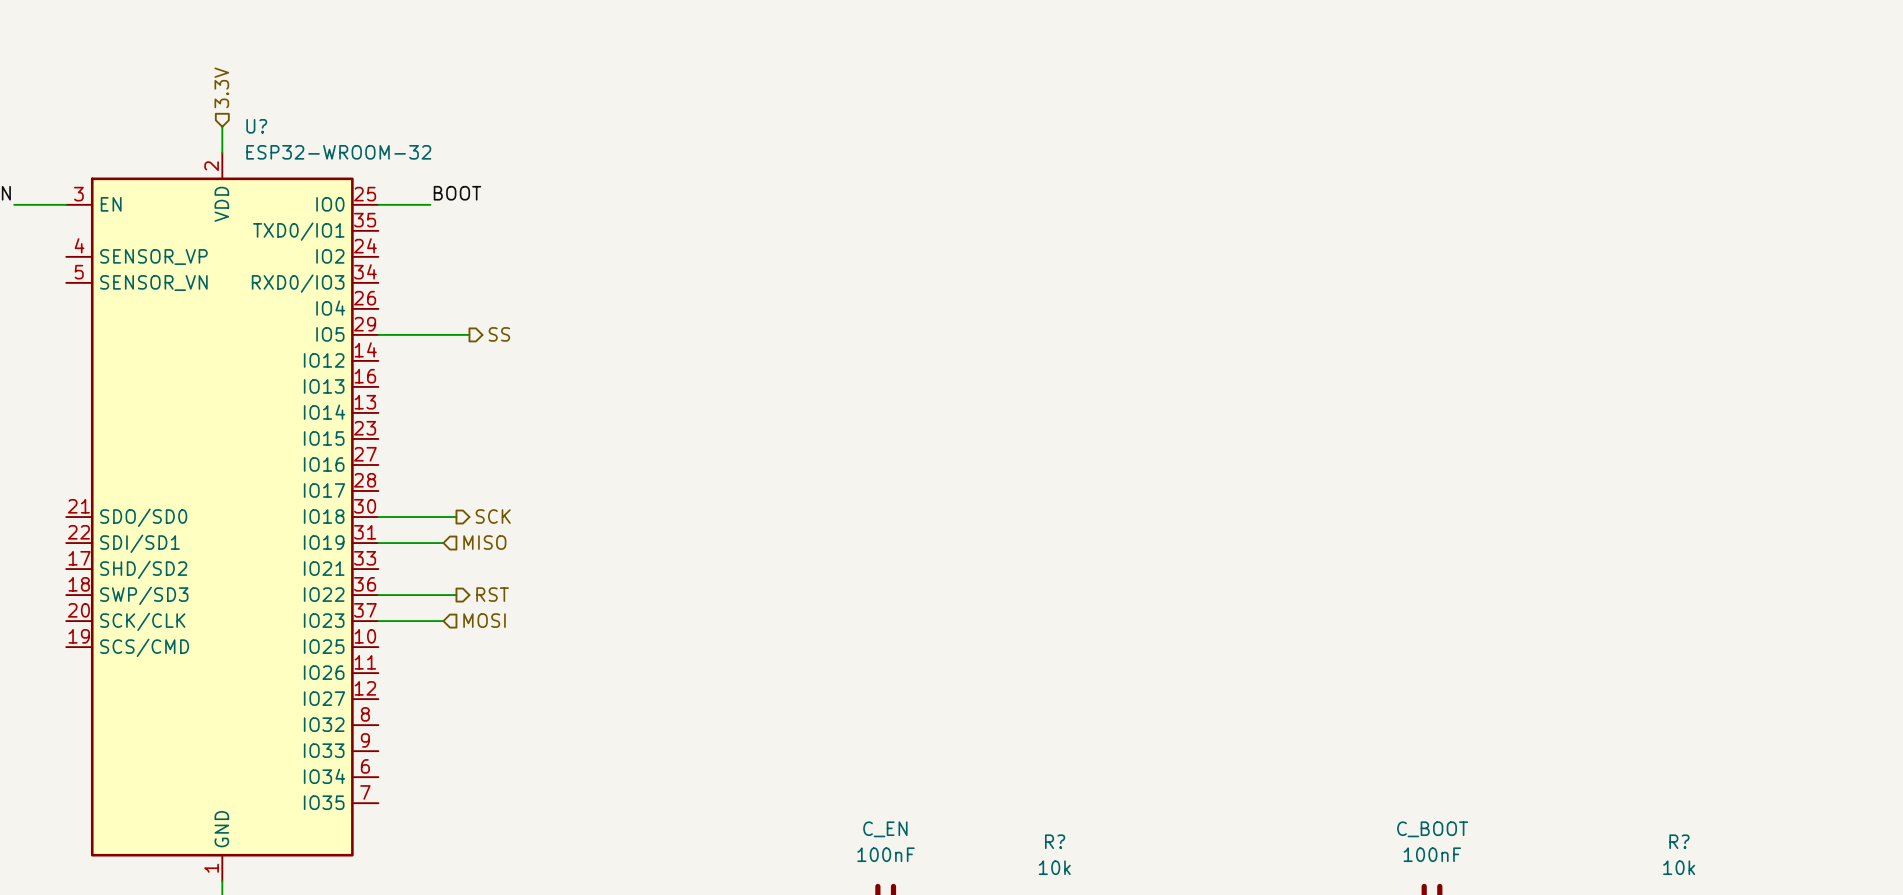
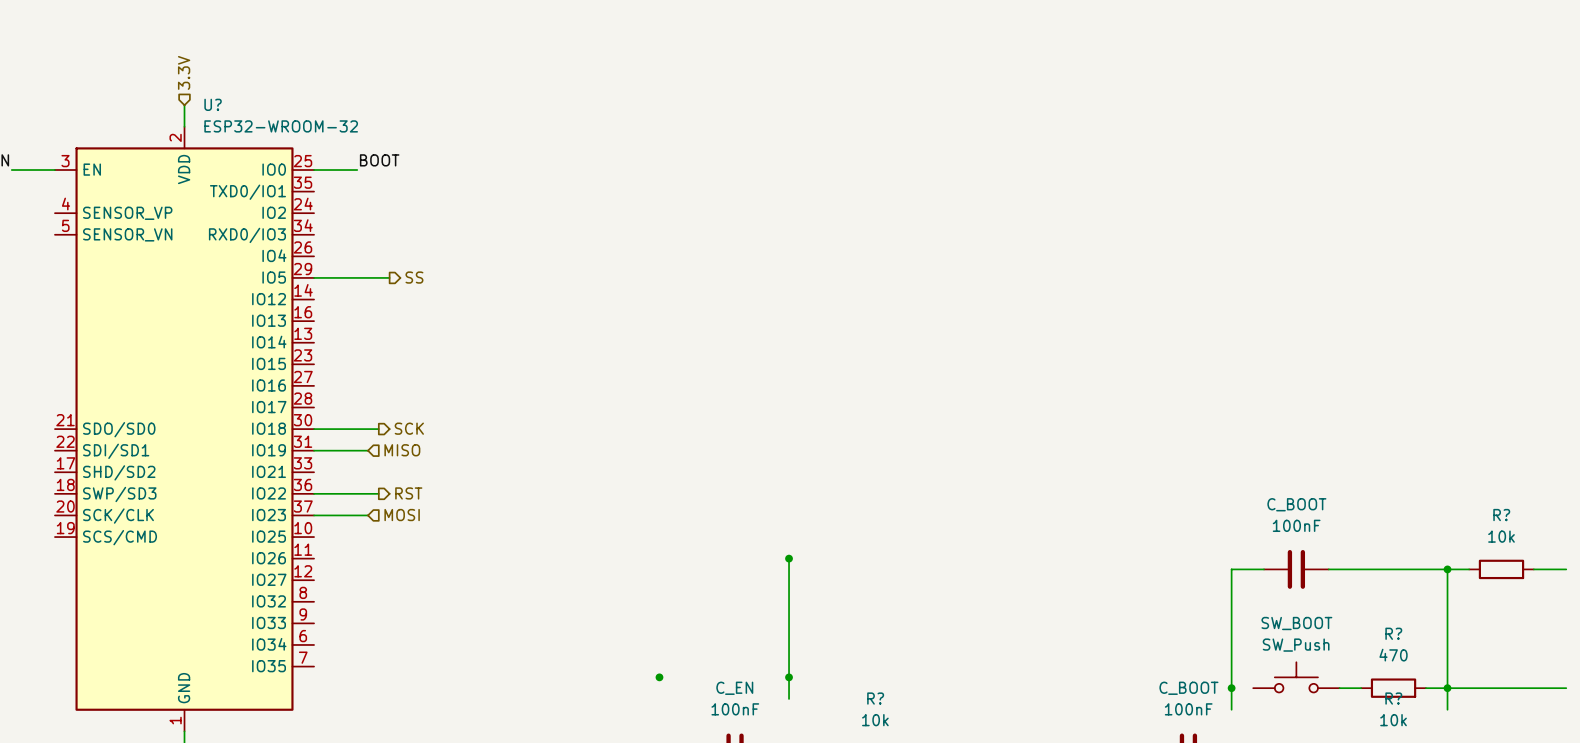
wire: none -> (789, 558) (789, 698)
junction: none -> (789, 558)
wire: none -> (1264, 569) (1231, 569) (1231, 709)
C_BOOT: none -> 100nF (1296, 569)
wire: none -> (1328, 569) (1469, 569)
wire: none -> (1447, 569) (1447, 709)
junction: none -> (1447, 569)
R?: none -> 10k (1501, 569)
wire: none -> (1533, 569) (1566, 569)
junction: none -> (659, 677)
junction: none -> (789, 677)
SW_BOOT: none -> SW_Push (1296, 677)
junction: none -> (1231, 688)
wire: none -> (1339, 688) (1361, 688)
R?: none -> 470 (1393, 688)
wire: none -> (1425, 688) (1566, 688)
junction: none -> (1447, 688)

